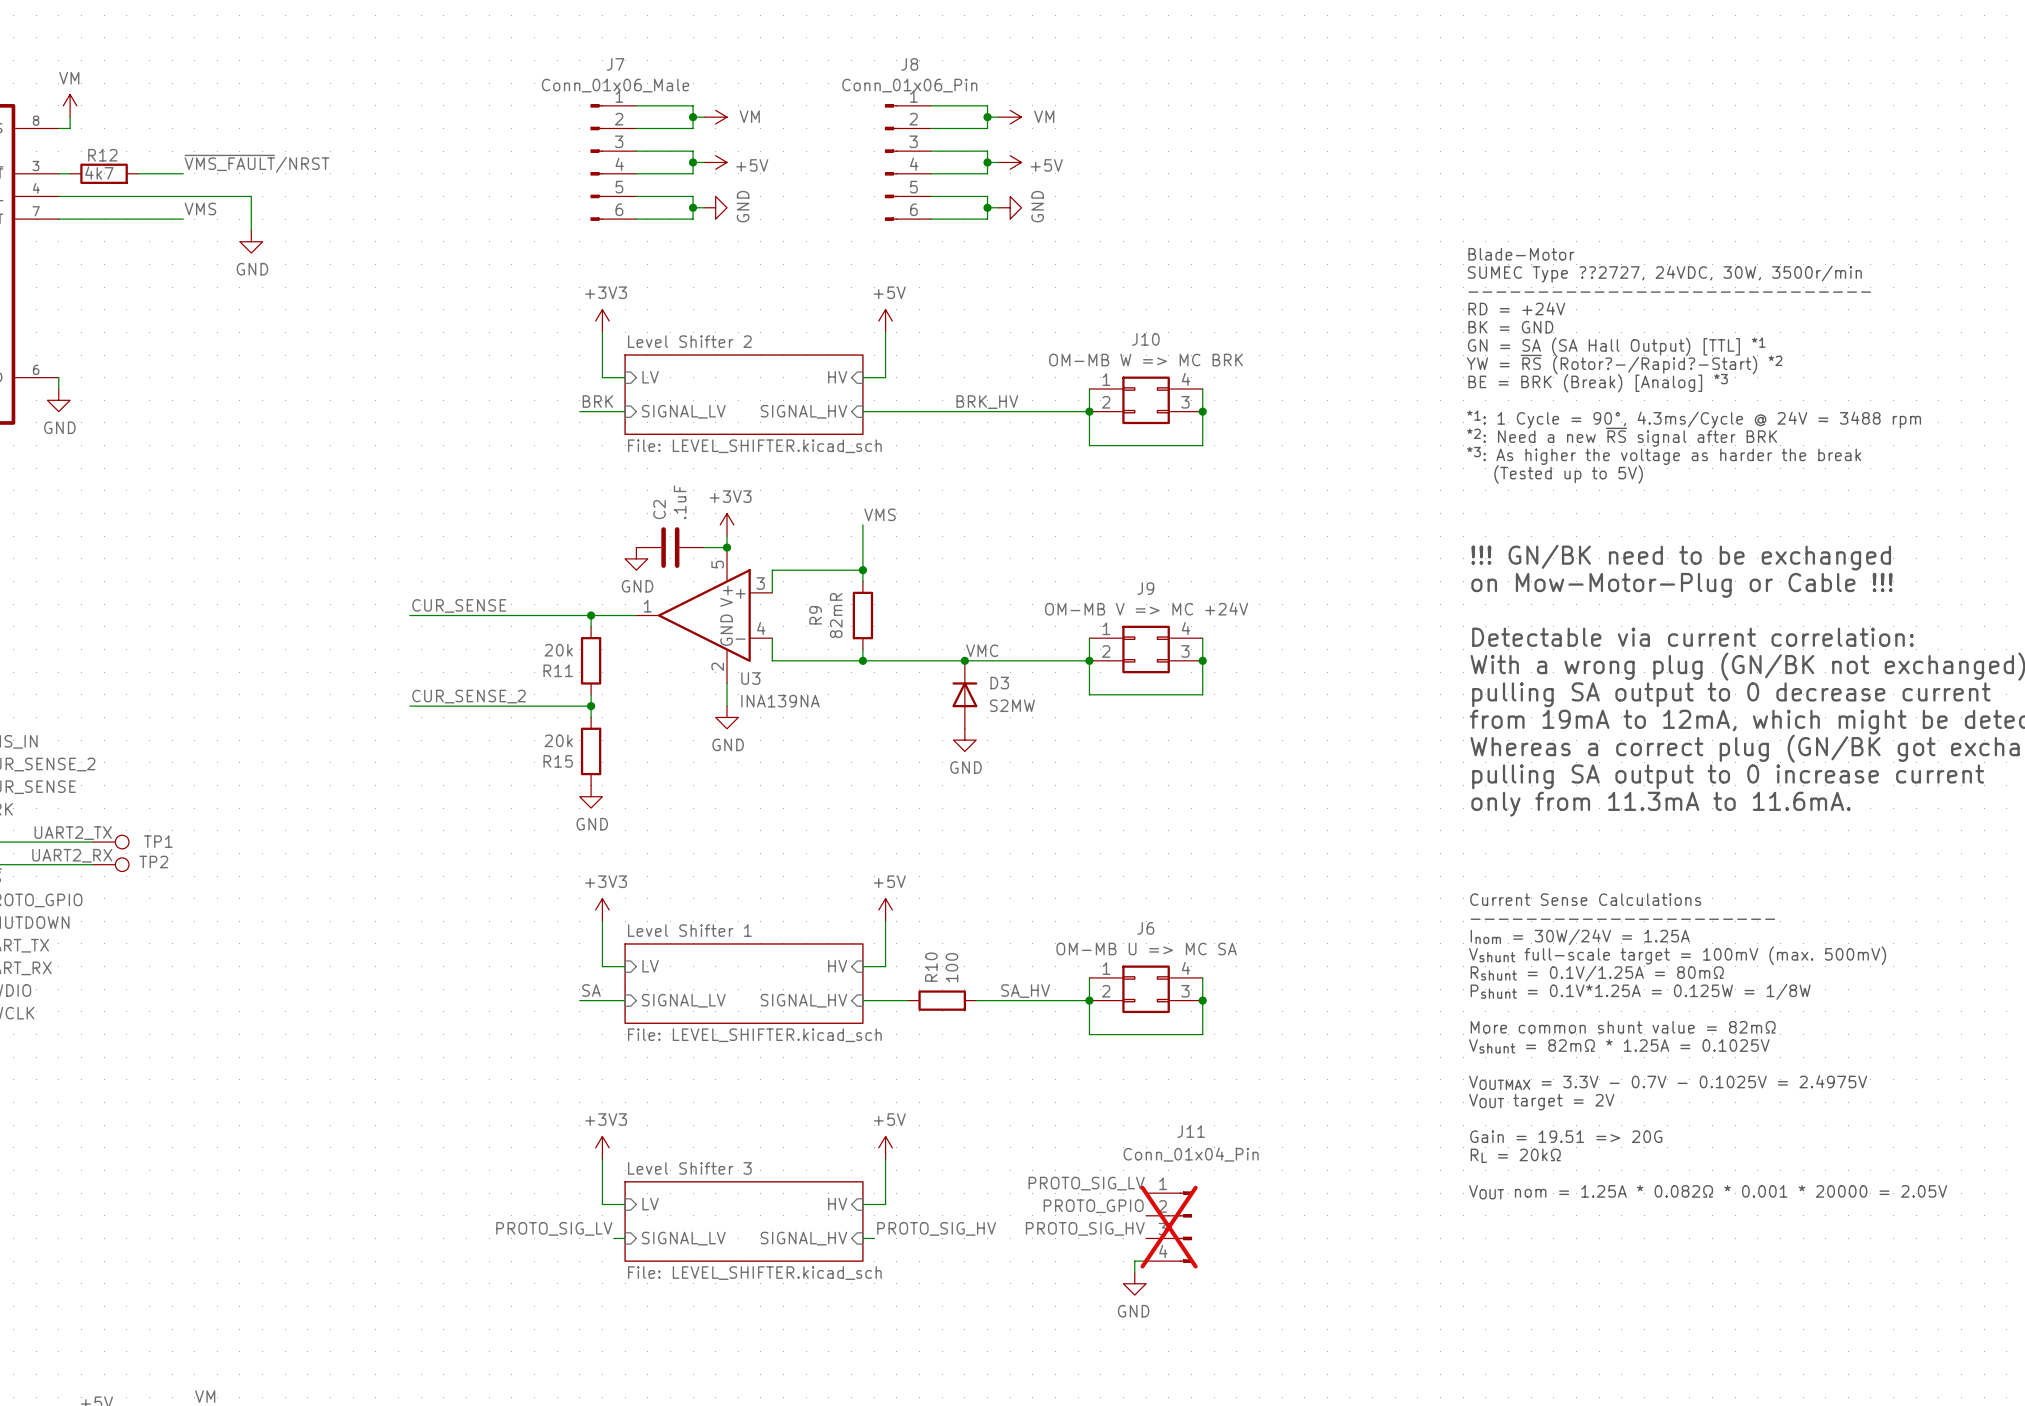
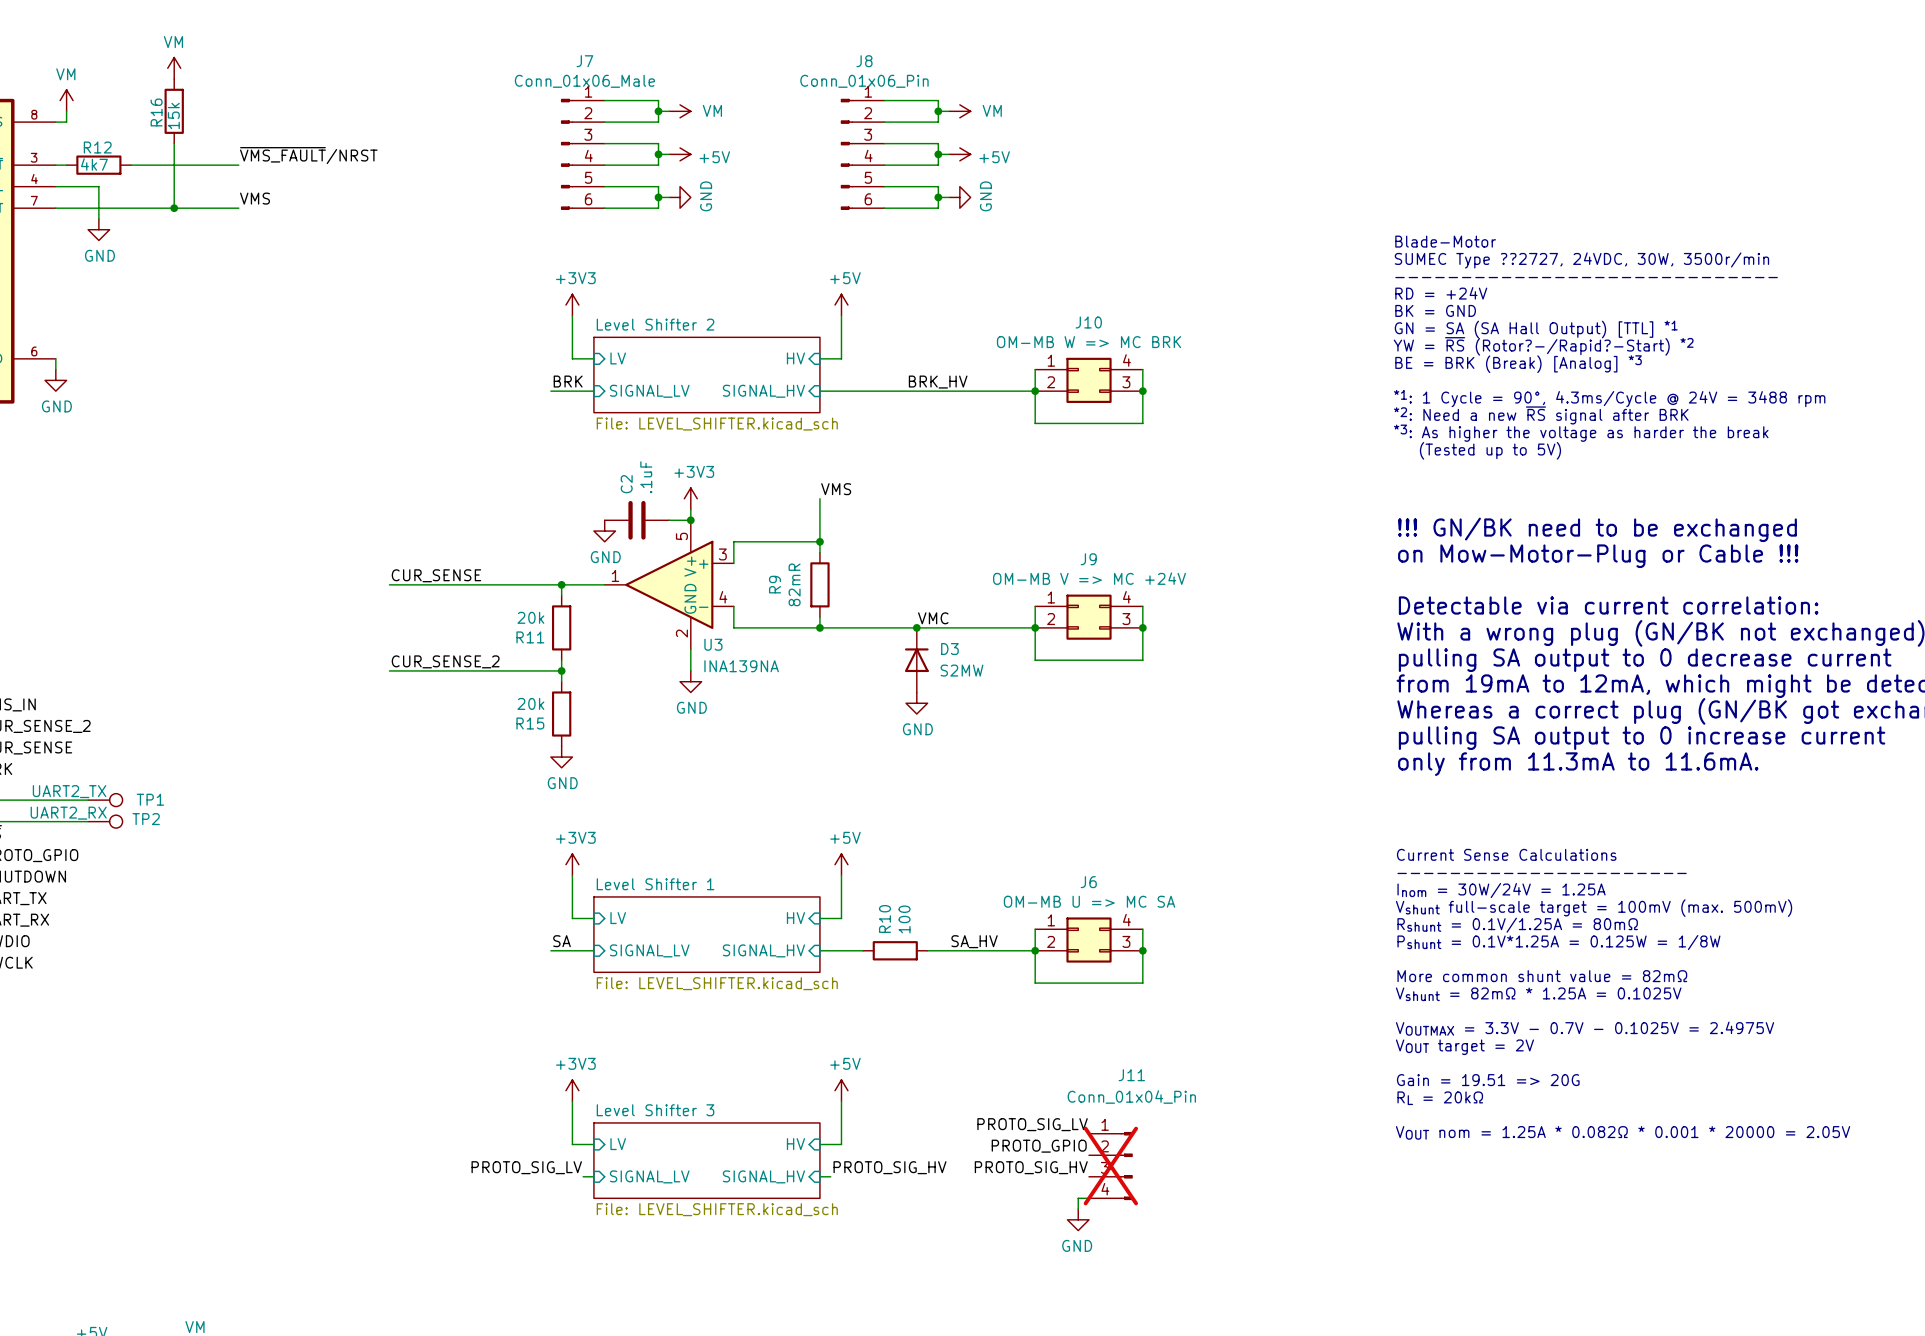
power symbol: none -> VM (174, 68)
R16: none -> 15k (174, 111)
wire: none -> (174, 143) (174, 208) (238, 208)
label position: ~{VMS_FAULT}/NRST (257, 163) -> ~{VMS_FAULT}/NRST (308, 155)
wire: none -> (174, 165) (238, 165)
wire: (104, 196) (251, 196) (251, 230) -> (98, 186) (98, 218)
label position: VMS (200, 208) -> VMS (255, 198)
junction: none -> (174, 208)
power symbol position: GND (251, 241) -> GND (98, 229)

